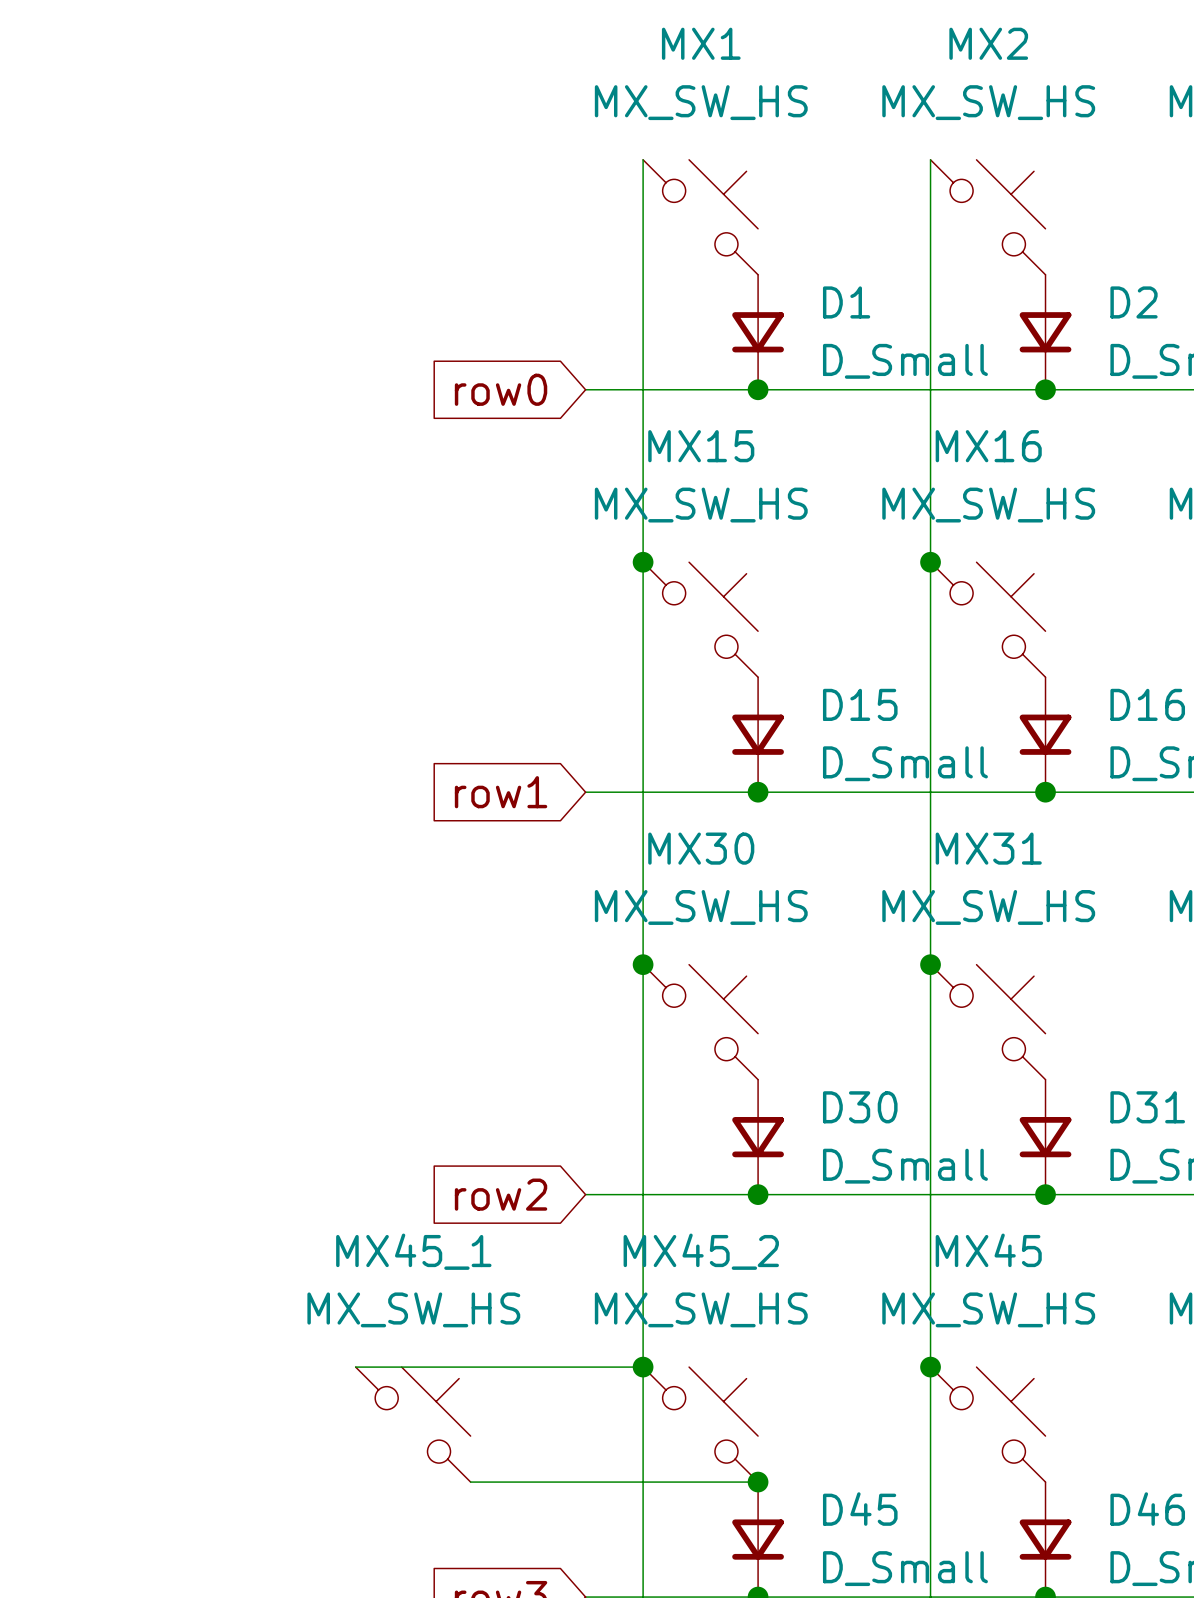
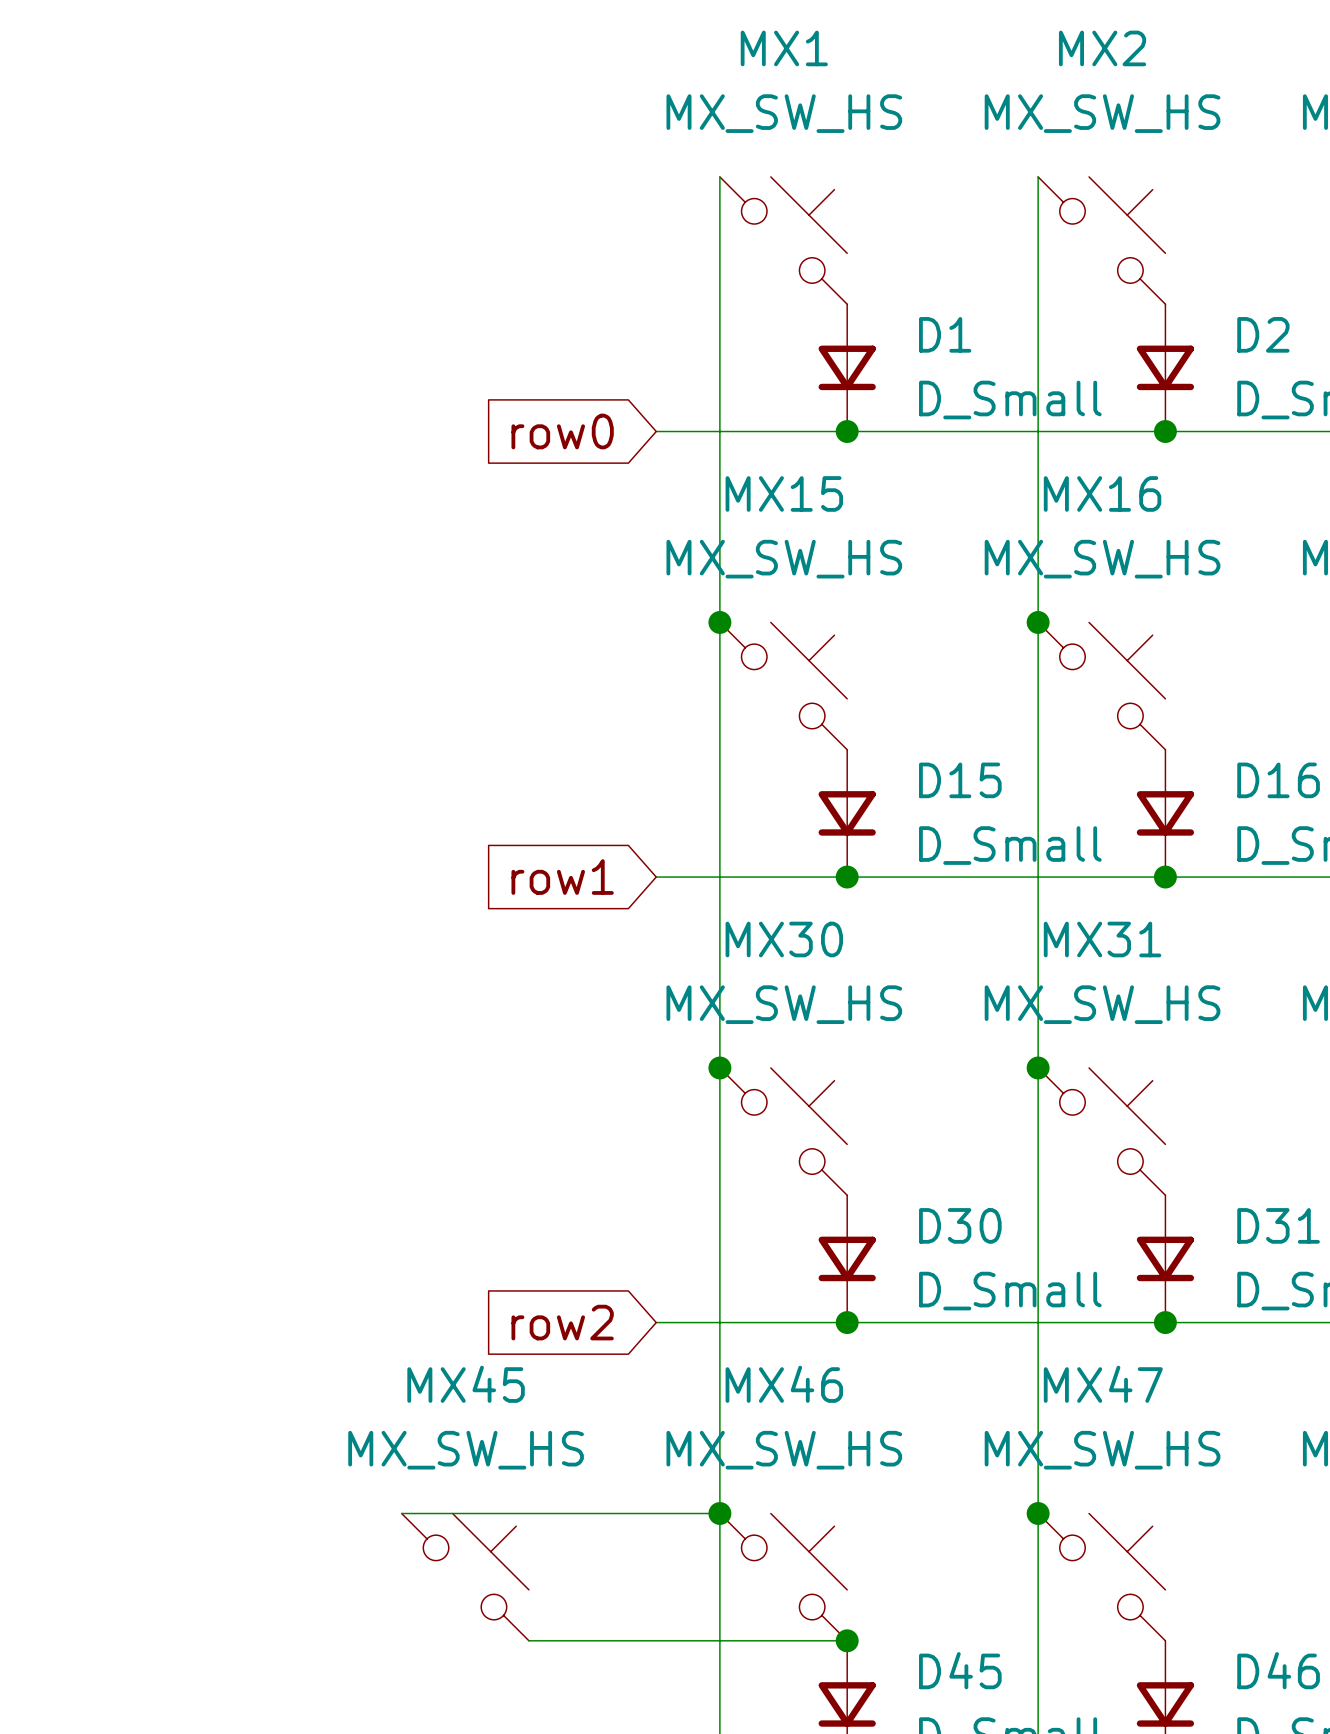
MX45 name: MX45 (988, 1250) -> MX47 (1103, 1384)
MX45_1 name: MX45_1 (413, 1251) -> MX45 (466, 1384)
MX45_2 name: MX45_2 (701, 1251) -> MX46 (784, 1384)

